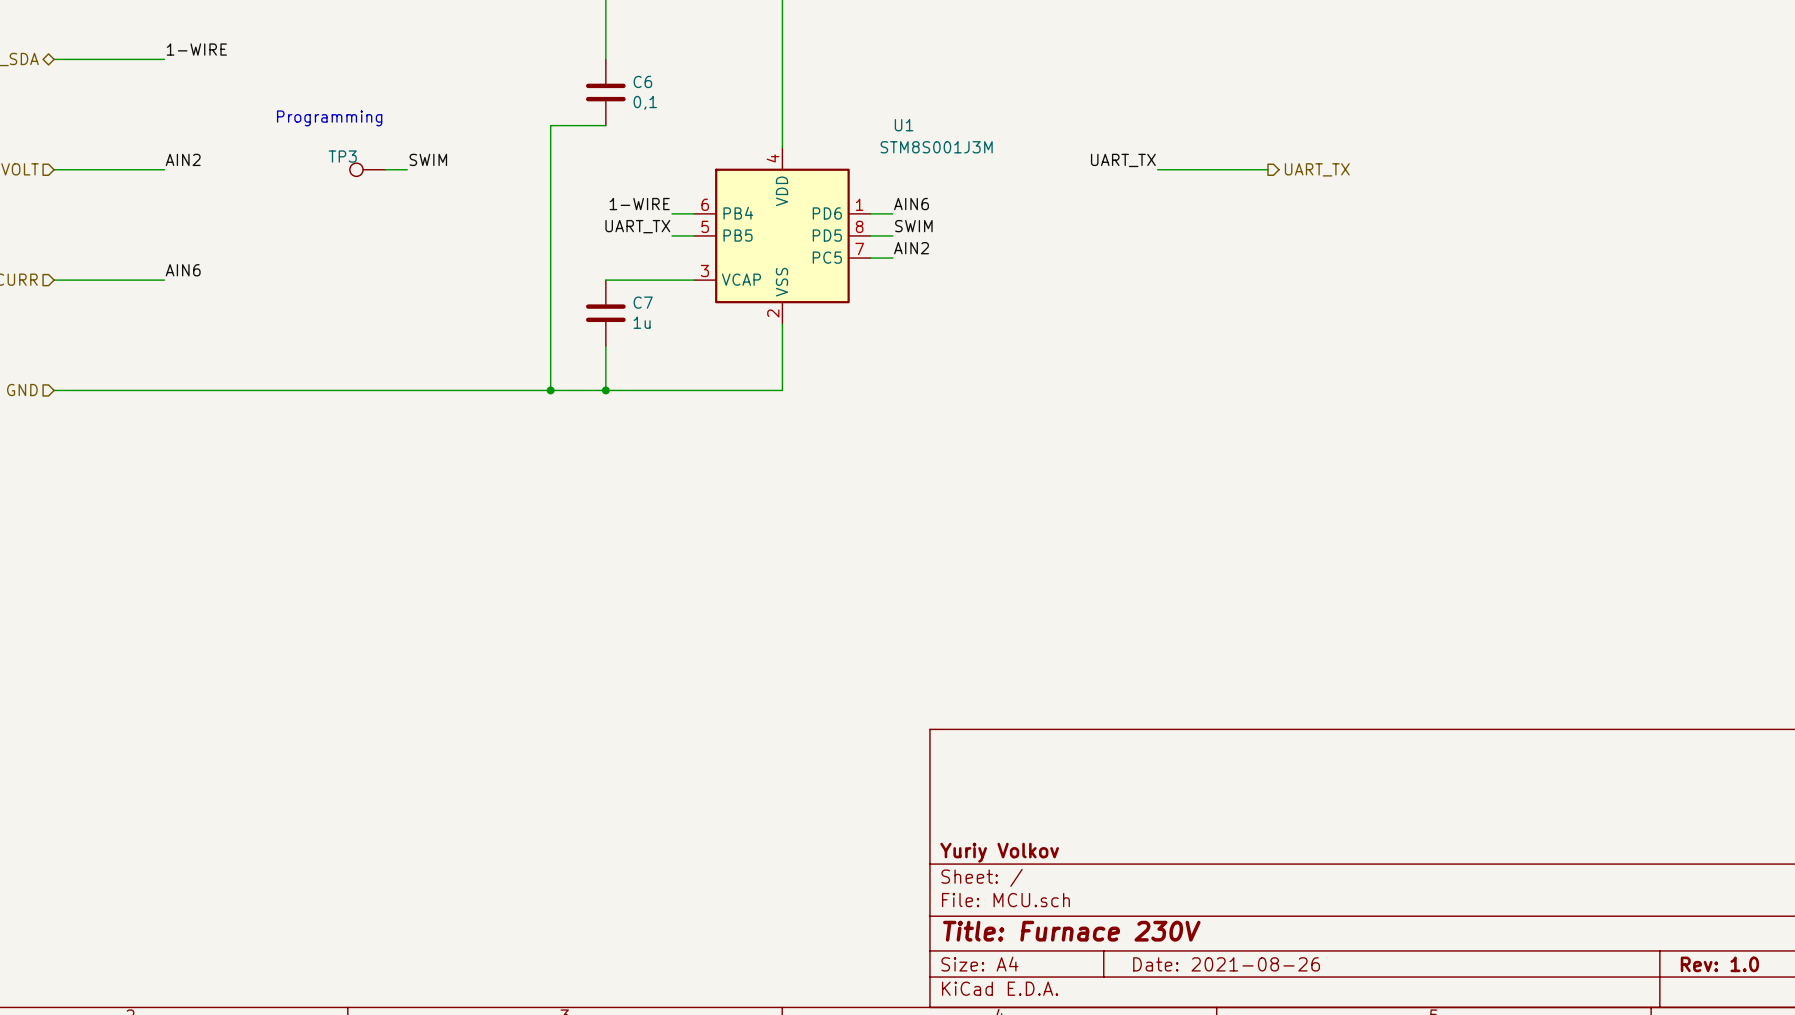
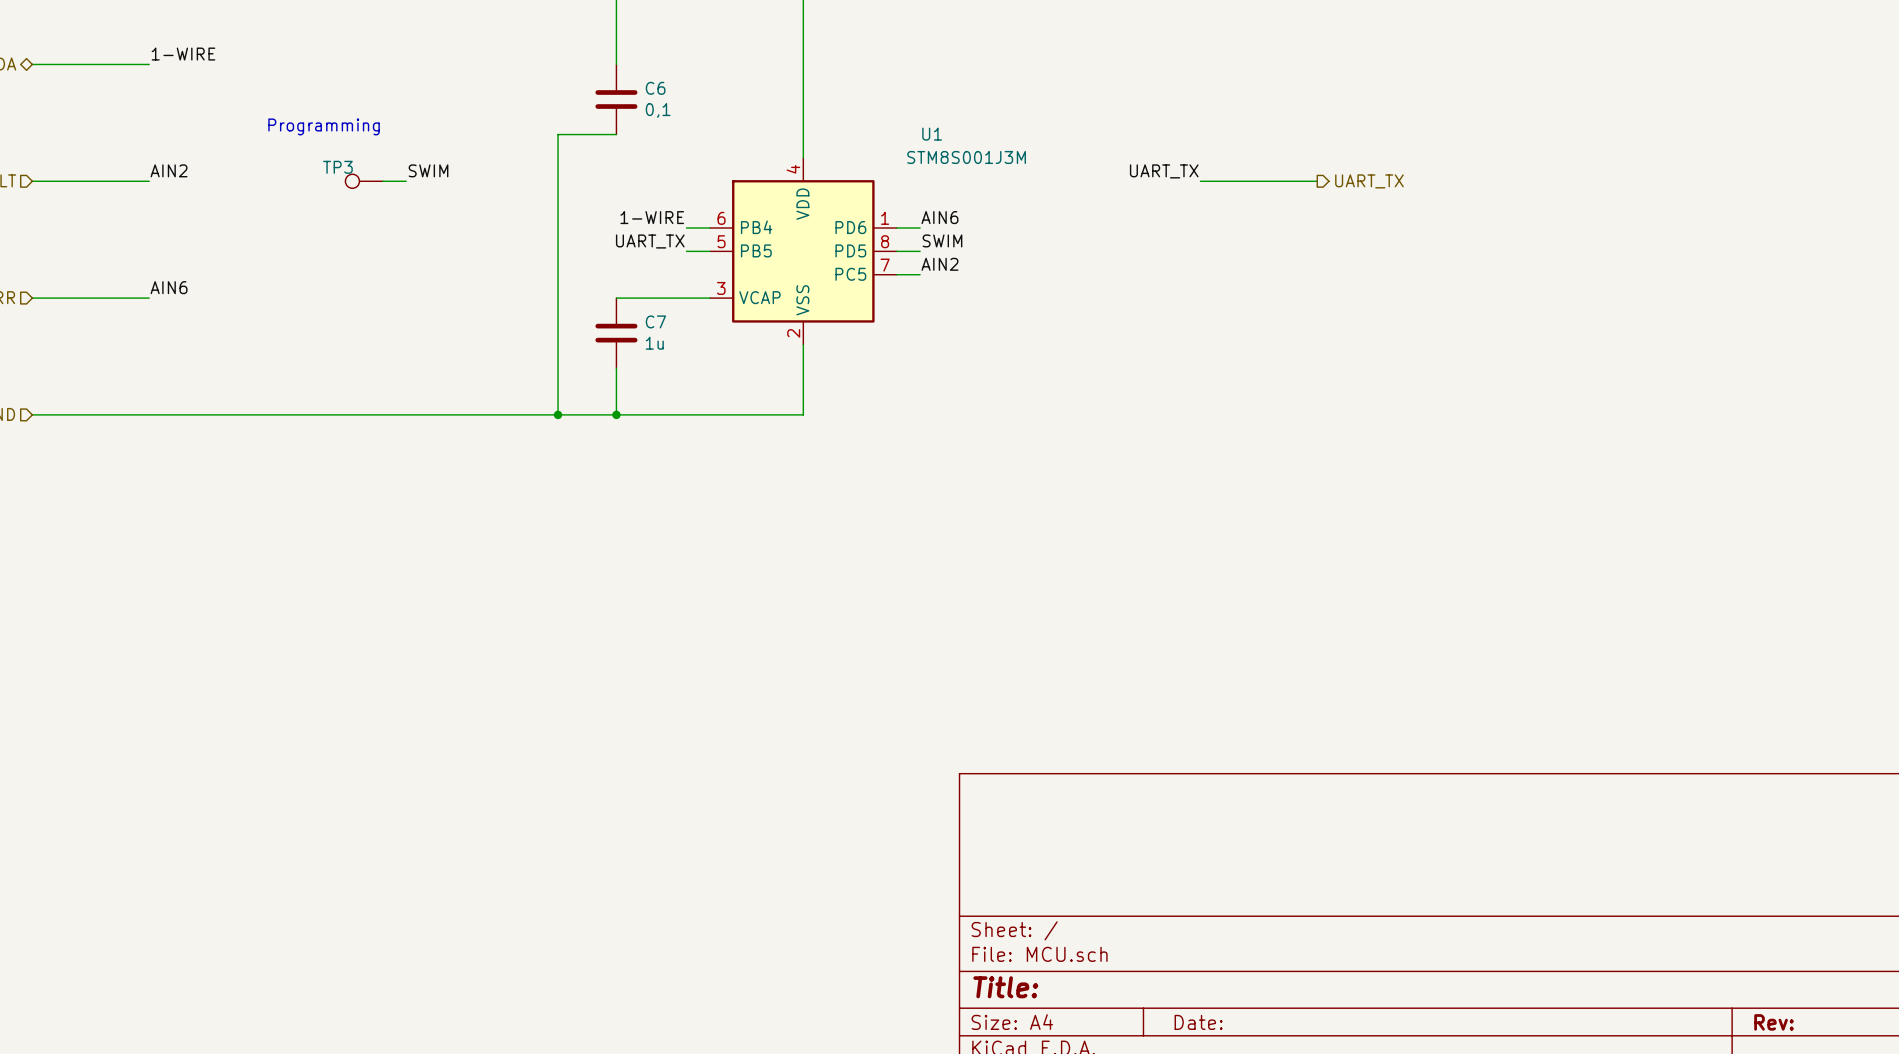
title block: Yuriy Volkov (999, 852) -> none
title block: Title: Furnace 230V (1071, 931) -> Title: (1005, 987)
title block: Date: 2021-08-26 (1226, 964) -> Date: (1198, 1022)
title block: Rev: 1.0 (1719, 964) -> Rev: (1774, 1022)

